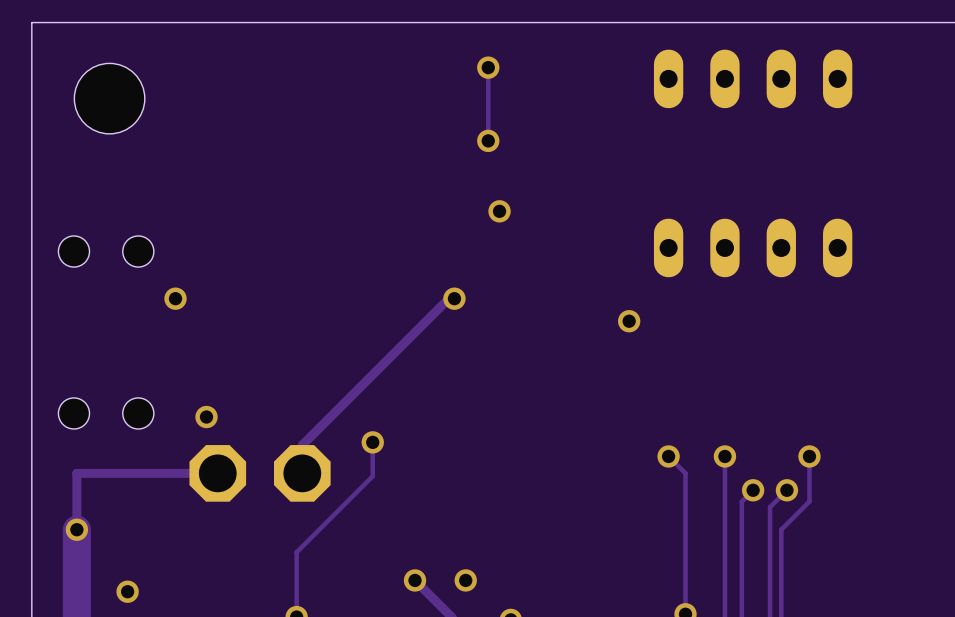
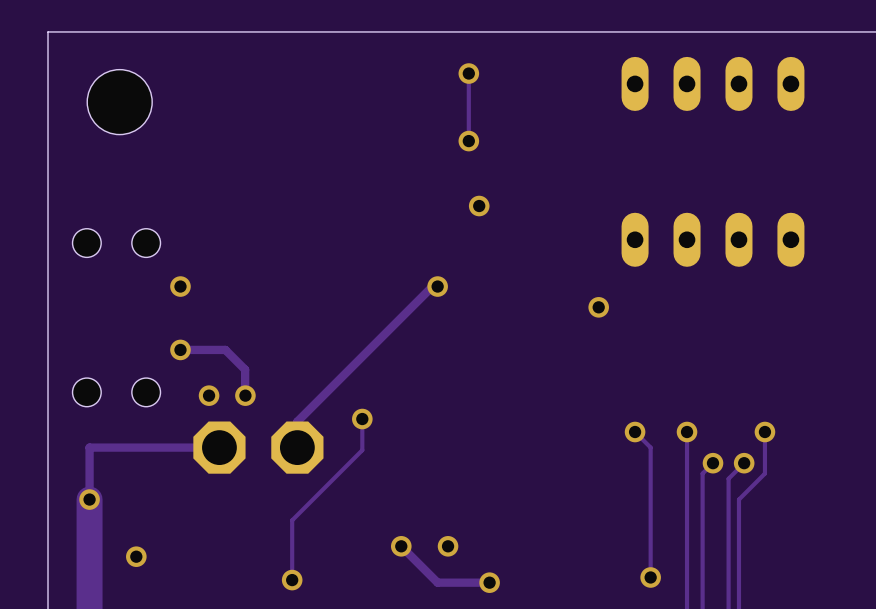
track: none -> (180, 349) (225, 349) (245, 369) (245, 395)
via: none -> (180, 349)
via: none -> (245, 395)

